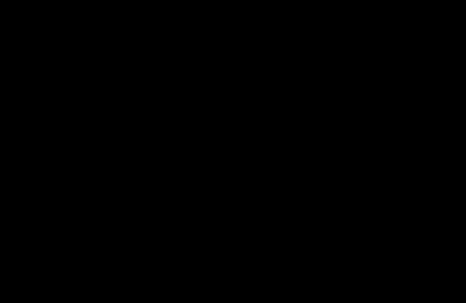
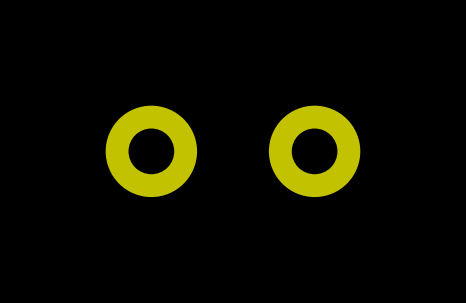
part: none -> (151, 151)
part: none -> (314, 151)

